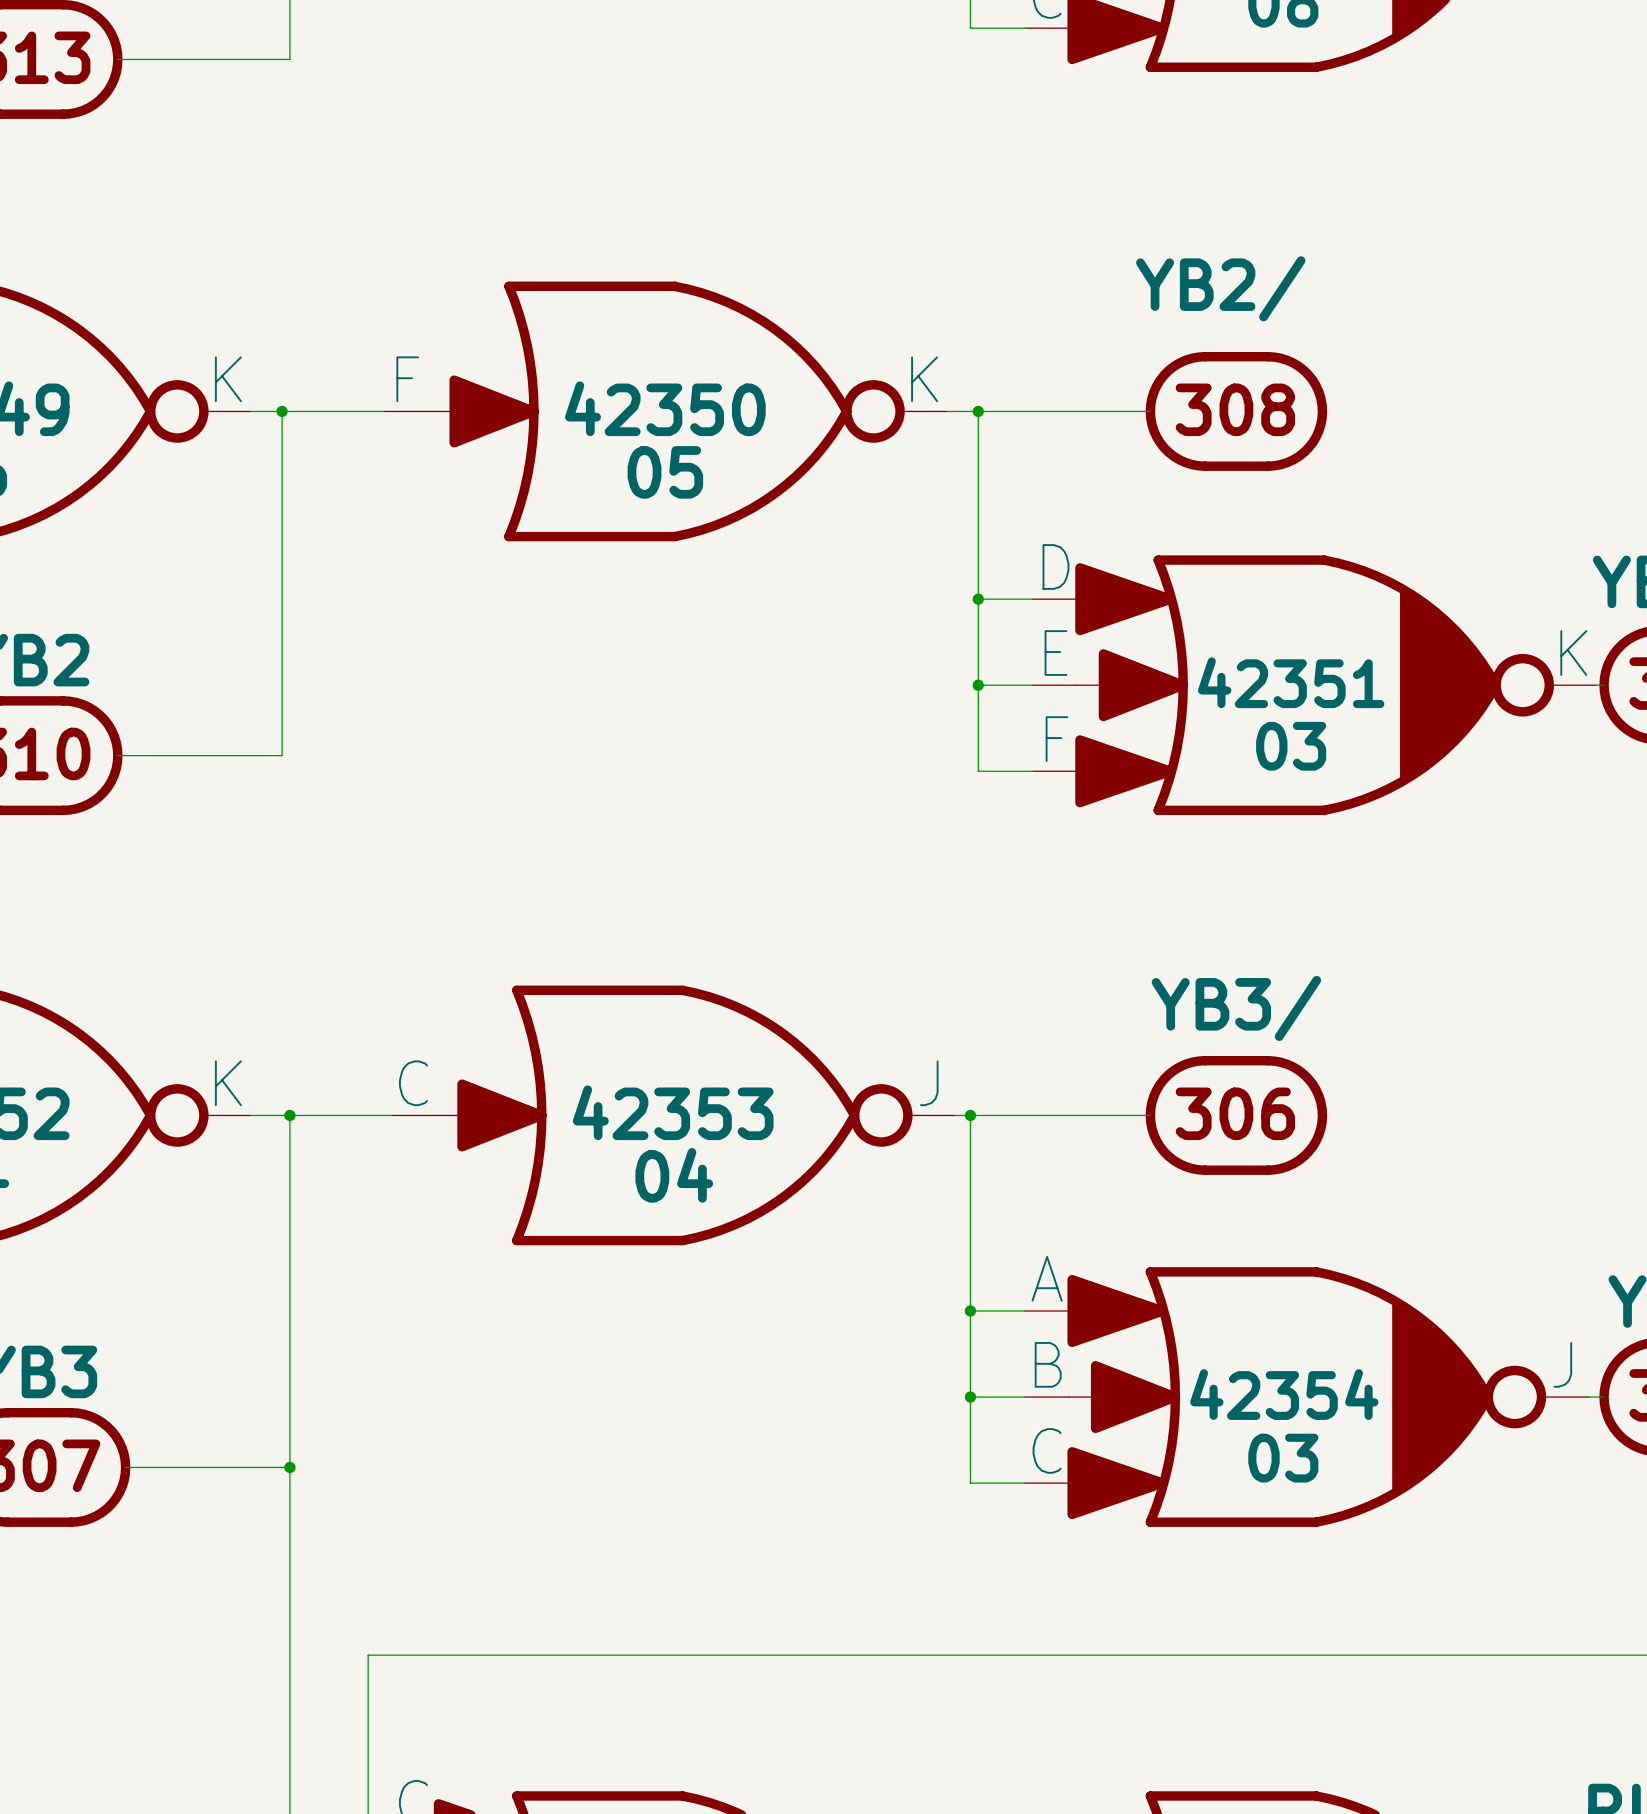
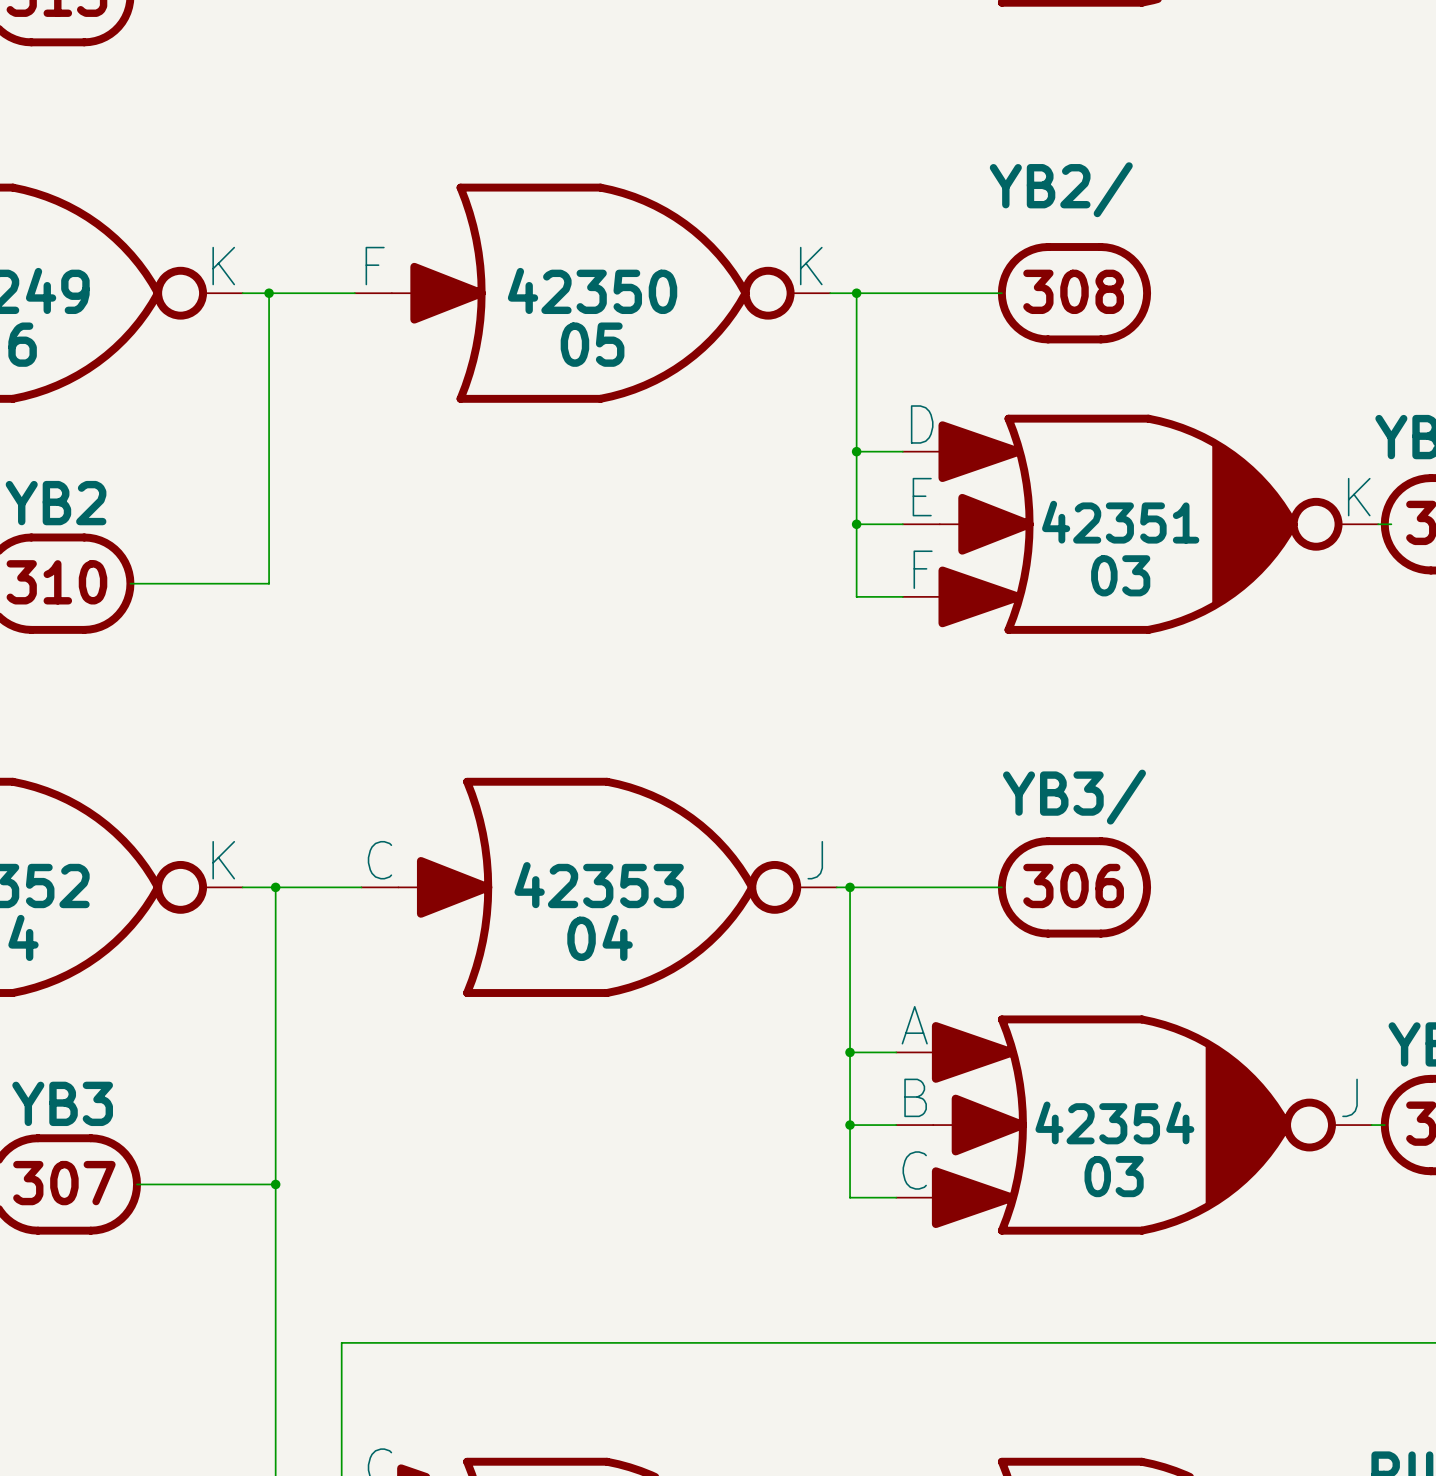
wire: none -> (1384, 524) (1391, 524)

